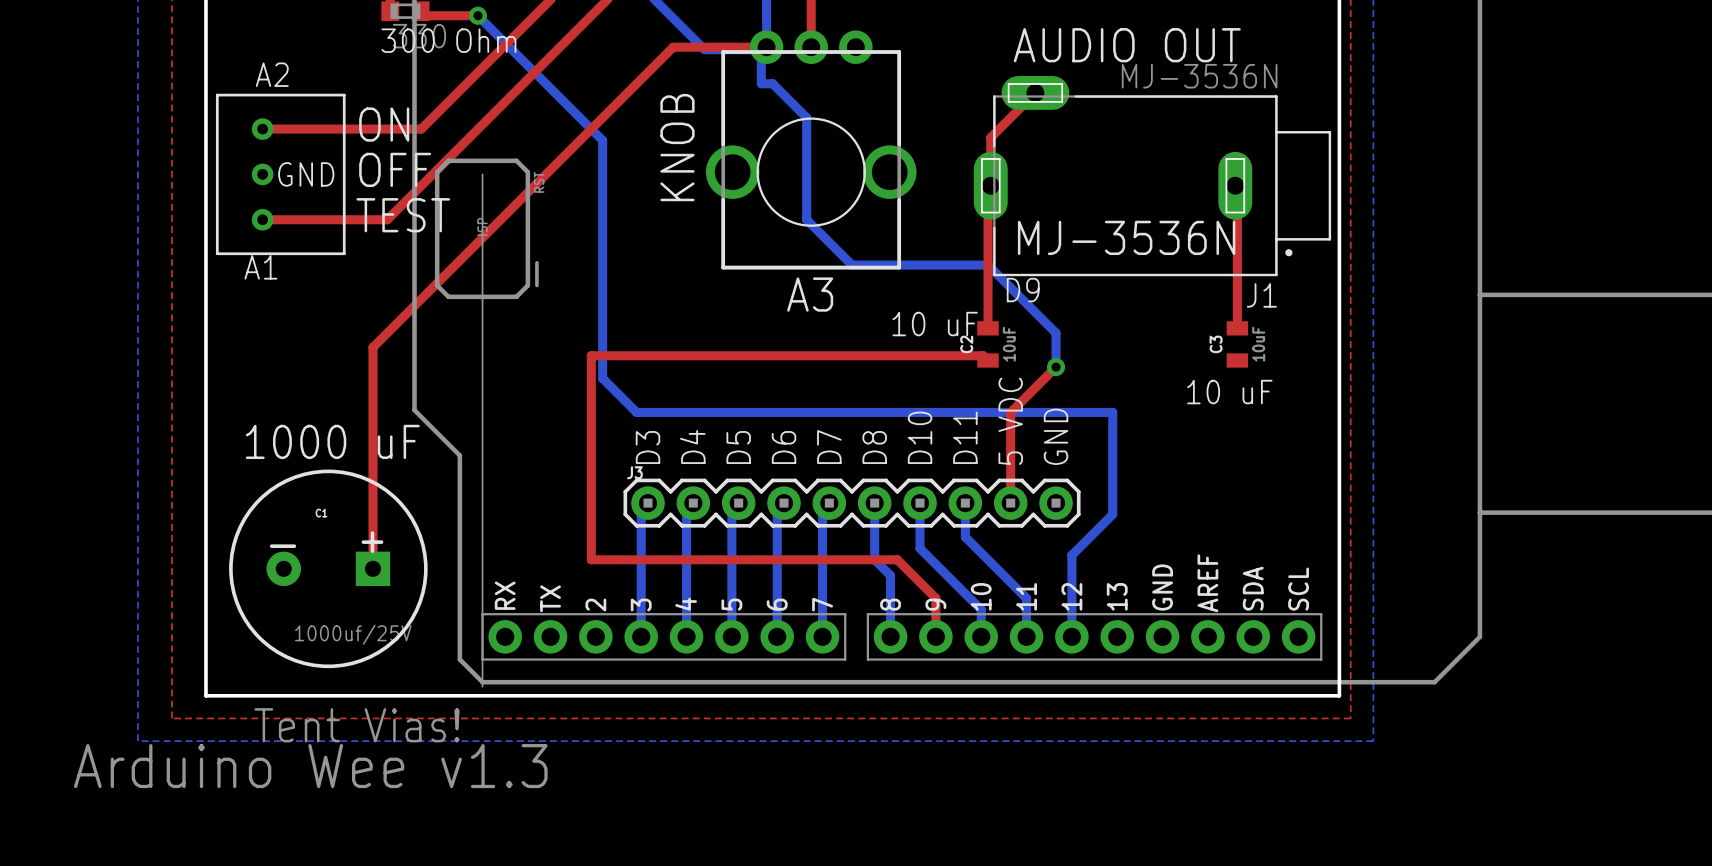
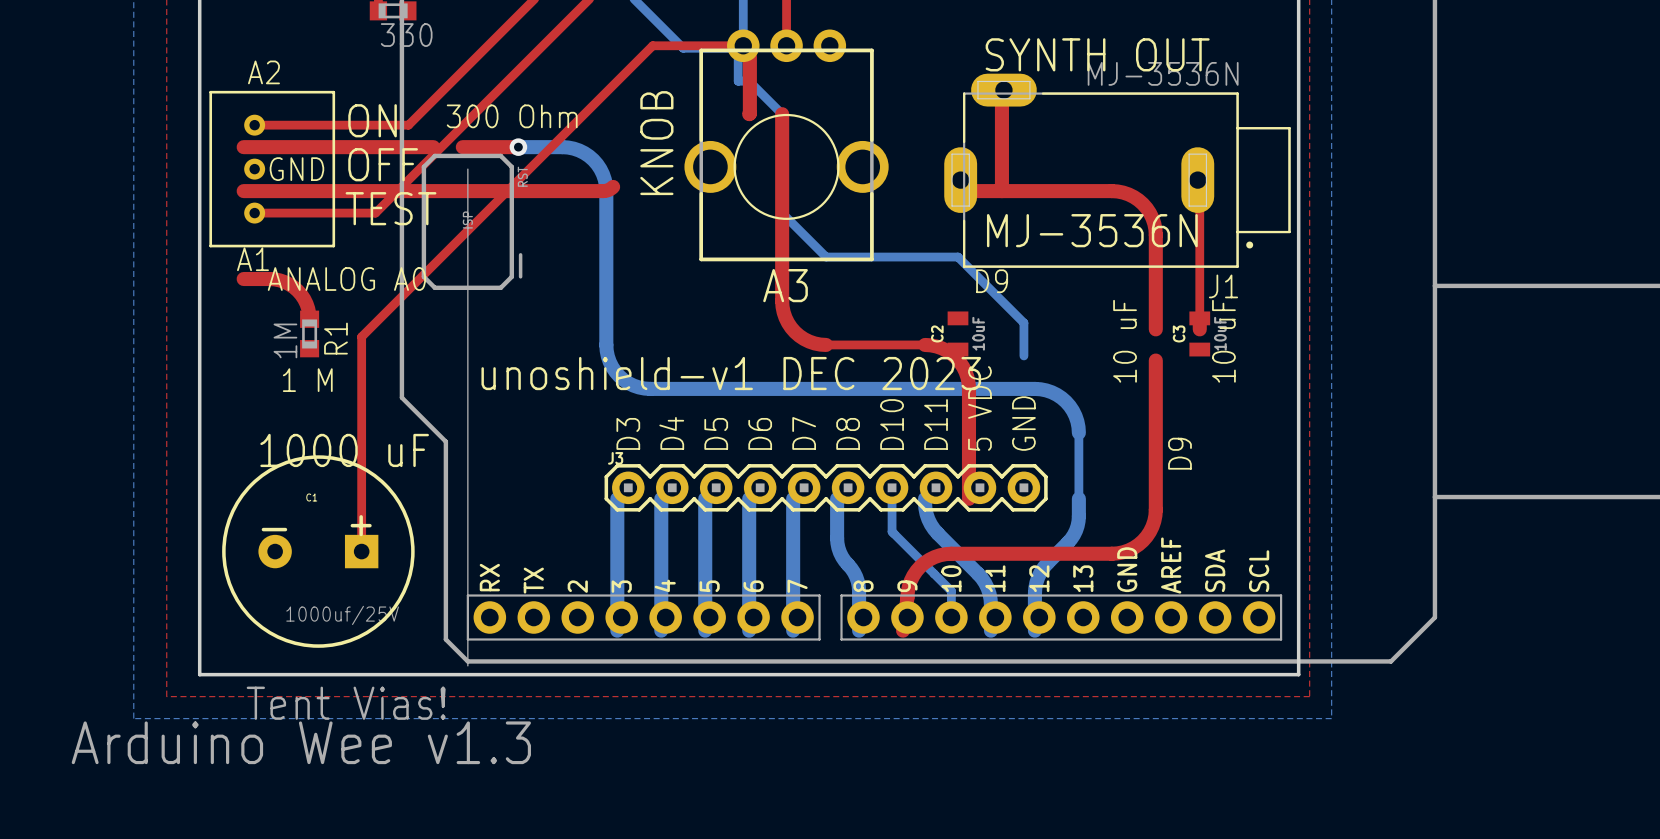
top track: (420, 11) (425, 15) (477, 15) -> none
bottom track: (477, 15) (602, 140) (602, 378) (636, 412) (1112, 412) (1112, 446) -> (518, 147) (573, 148) (593, 160) (602, 174) (606, 191) (606, 350) (615, 371) (628, 383) (650, 388) (1040, 389) (1056, 394) (1069, 406) (1075, 416) (1078, 432)
via: (477, 15) -> none
text position: 300 Ohm (448, 40) -> 300 Ohm (512, 116)
text: AUDIO OUT (1127, 45) -> SYNTH OUT (1097, 54)
top track: none -> (749, 56) (749, 114)
top track: (1035, 92) (990, 137) (990, 185) (988, 188) (988, 328) -> none
top track: none -> (1003, 101) (1001, 103) (1001, 191)
top track: none -> (243, 147) (433, 147)
top track: none -> (467, 147) (462, 147) (518, 147)
via: none -> (518, 147)
top track: none -> (613, 186) (603, 191) (243, 191)
top track: none -> (960, 191) (1111, 191) (1123, 192) (1138, 200) (1149, 213) (1155, 229) (1155, 329)
top track: none -> (243, 279) (274, 279) (289, 284) (304, 299) (309, 319)
text: none -> ANALOG A0 (346, 279)
text rotation: 0° (935, 324) -> 90° counterclockwise (1223, 341)
text position: 10 uF (935, 324) -> 10 uF (1223, 341)
top track: none -> (1199, 318) (1199, 329)
R1: none -> 1M (309, 333)
top track: (852, 355) (591, 355) (591, 559) (897, 559) (935, 598) (935, 636) -> (826, 344) (809, 341) (795, 332) (785, 317) (782, 306) (782, 114)
top track: (954, 355) (983, 355) (988, 360) -> (925, 344) (936, 346) (951, 354) (959, 362) (967, 377) (968, 498)
top track: (1056, 367) (1010, 412) (1010, 503) -> none
via: (1056, 367) -> none
top track: none -> (1155, 360) (1155, 515) (1149, 531) (1142, 540) (1128, 550) (1117, 553) (951, 553) (934, 557) (920, 566) (910, 580) (903, 630)
text: none -> unoshield-v1 DEC 2023 (731, 373)
text: none -> 1 M (307, 380)
text rotation: 0° (1229, 392) -> 90° counterclockwise (1125, 341)
text position: 1000 uF (332, 441) -> 1000 uF (344, 450)
text: none -> D9 (1179, 453)
bottom track: (648, 503) (641, 509) (641, 636) -> none
bottom track: (693, 503) (686, 509) (686, 636) -> none
bottom track: (738, 503) (731, 509) (731, 636) -> none
bottom track: (784, 503) (777, 509) (777, 636) -> none
bottom track: (829, 503) (822, 509) (822, 636) -> none
bottom track: (874, 503) (874, 559) (890, 575) (890, 636) -> none
bottom track: (965, 503) (965, 537) (1026, 598) (1026, 636) -> none
bottom track: none -> (617, 498) (617, 630)
bottom track: none -> (661, 498) (661, 630)
bottom track: none -> (705, 498) (705, 630)
bottom track: none -> (749, 498) (749, 630)
bottom track: none -> (793, 498) (793, 630)
bottom track: none -> (837, 498) (837, 543) (842, 556) (854, 572) (857, 581) (859, 630)
bottom track: none -> (925, 498) (926, 513) (934, 529) (985, 582) (990, 599) (990, 630)
bottom track: (1112, 514) (1071, 555) (1071, 636) -> (1078, 498) (1078, 521) (1073, 534) (1044, 567) (1036, 582) (1034, 630)

